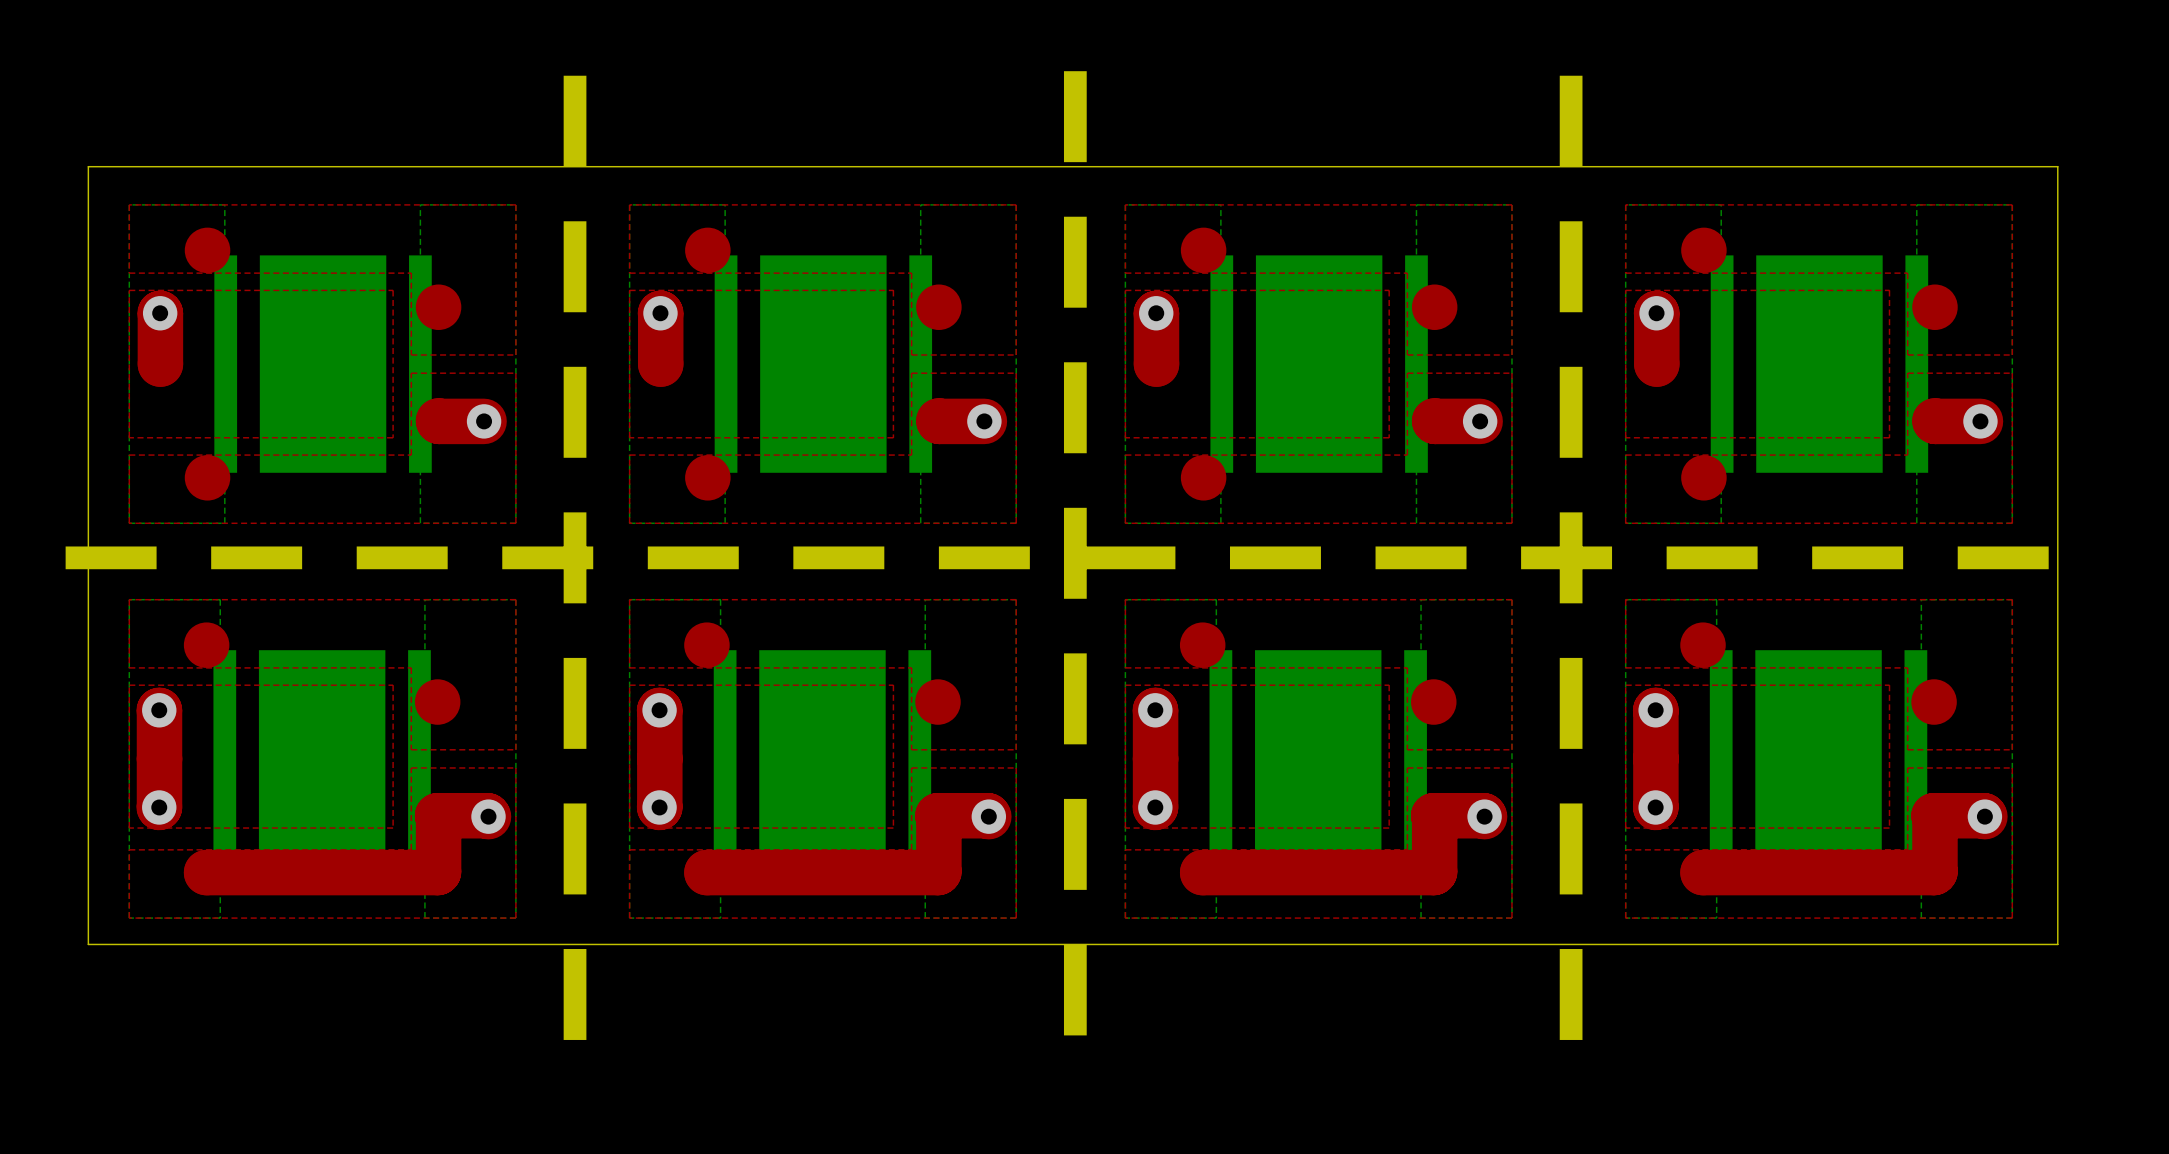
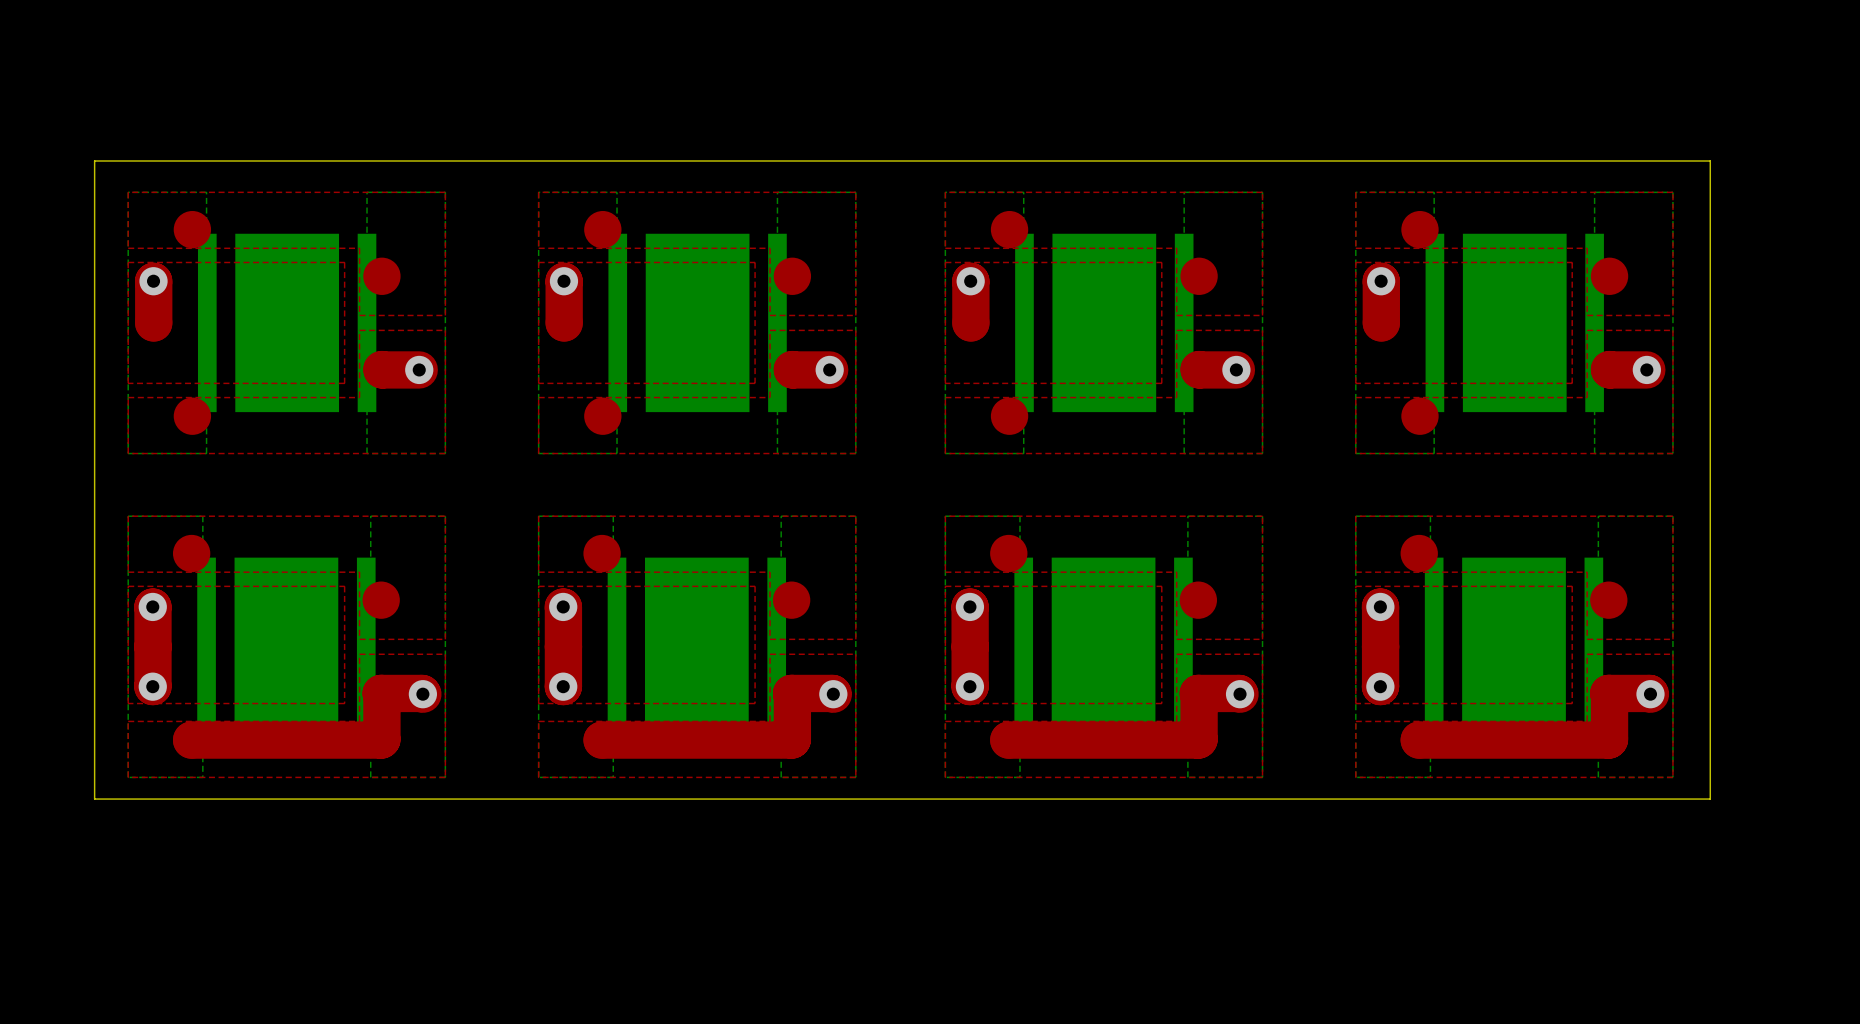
board edge: (1075, 71) (1075, 1044) -> none
board edge: (575, 75) (575, 1049) -> none
board edge: (1571, 75) (1571, 1049) -> none
board edge: (65, 557) (2103, 557) -> none

